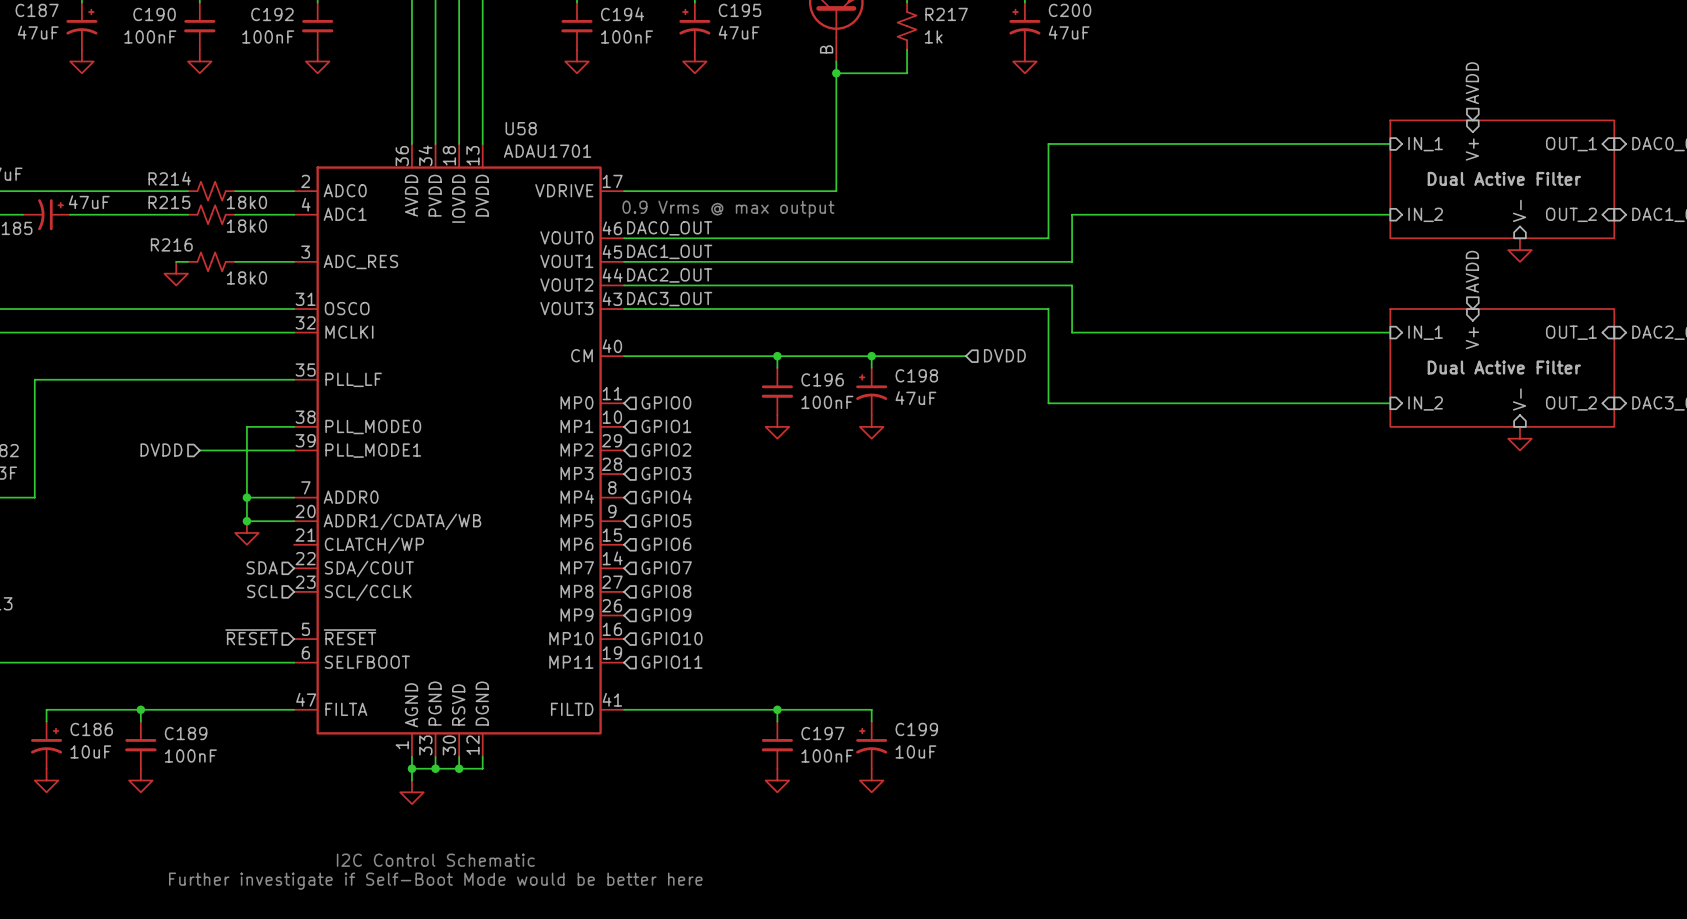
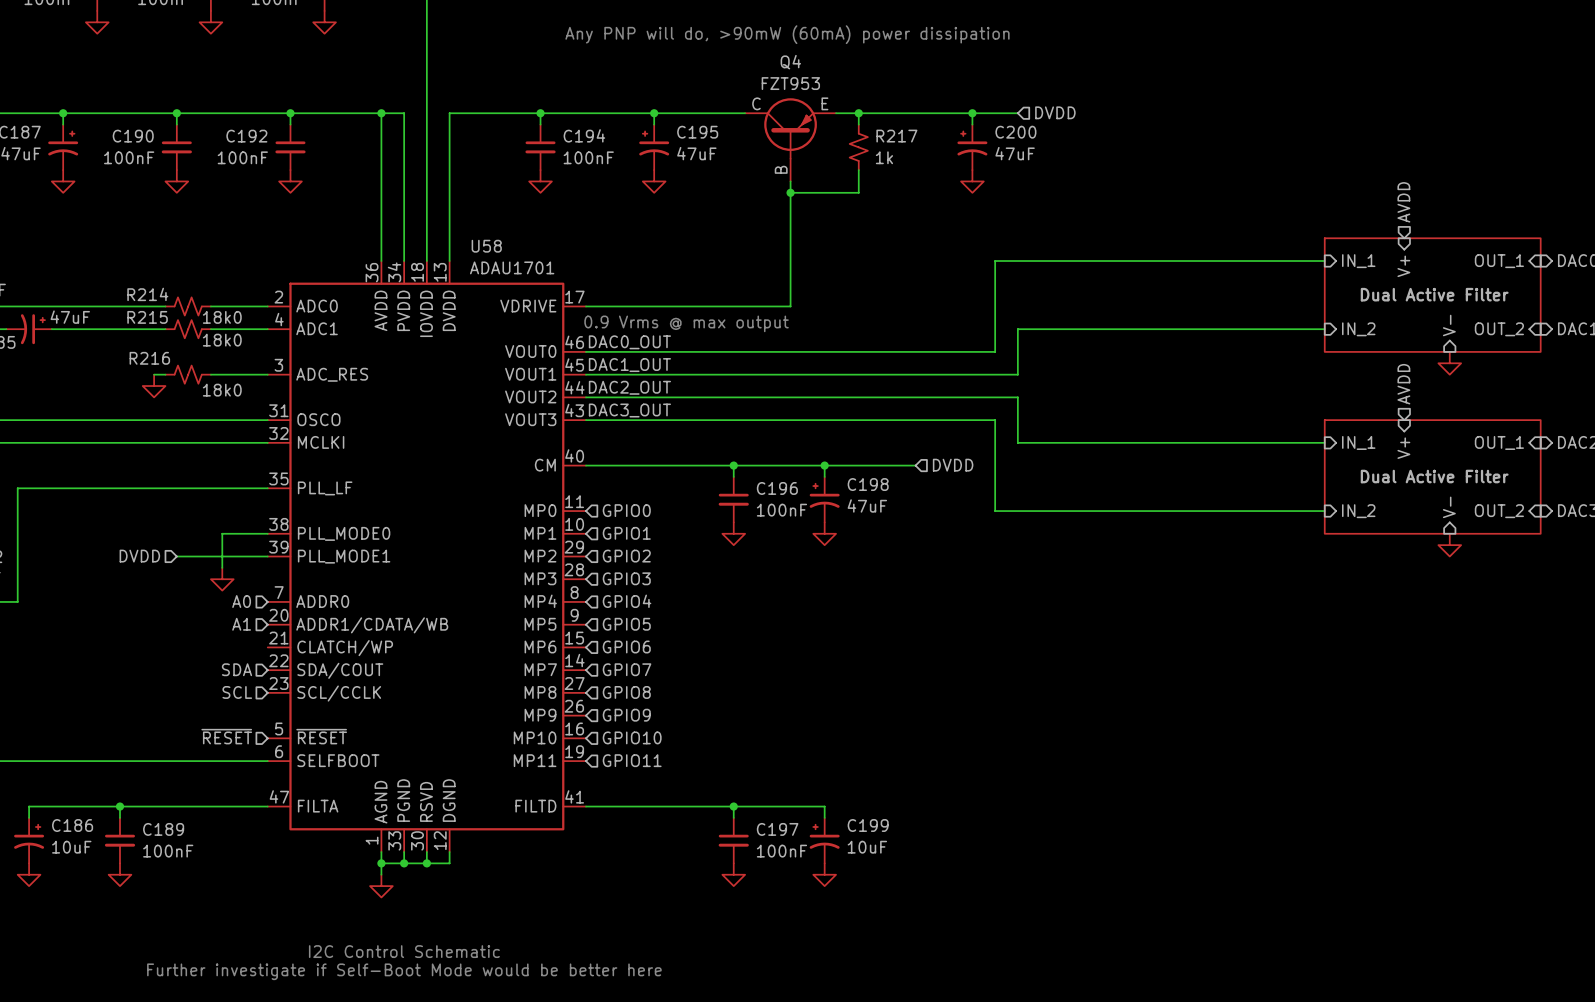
wire: (246, 462) (246, 521) (294, 521) -> none
wire: (246, 497) (294, 497) -> none
junction: (246, 497) -> none
hierarchical label: none -> A0 (241, 601)
hierarchical label: none -> A1 (241, 624)
junction: (246, 521) -> none
power symbol position: (246, 532) -> (222, 579)

